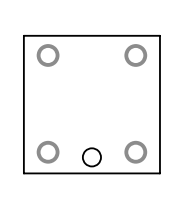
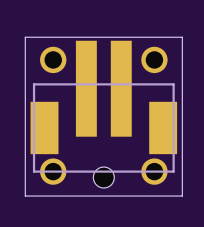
part: none -> (103, 106)

